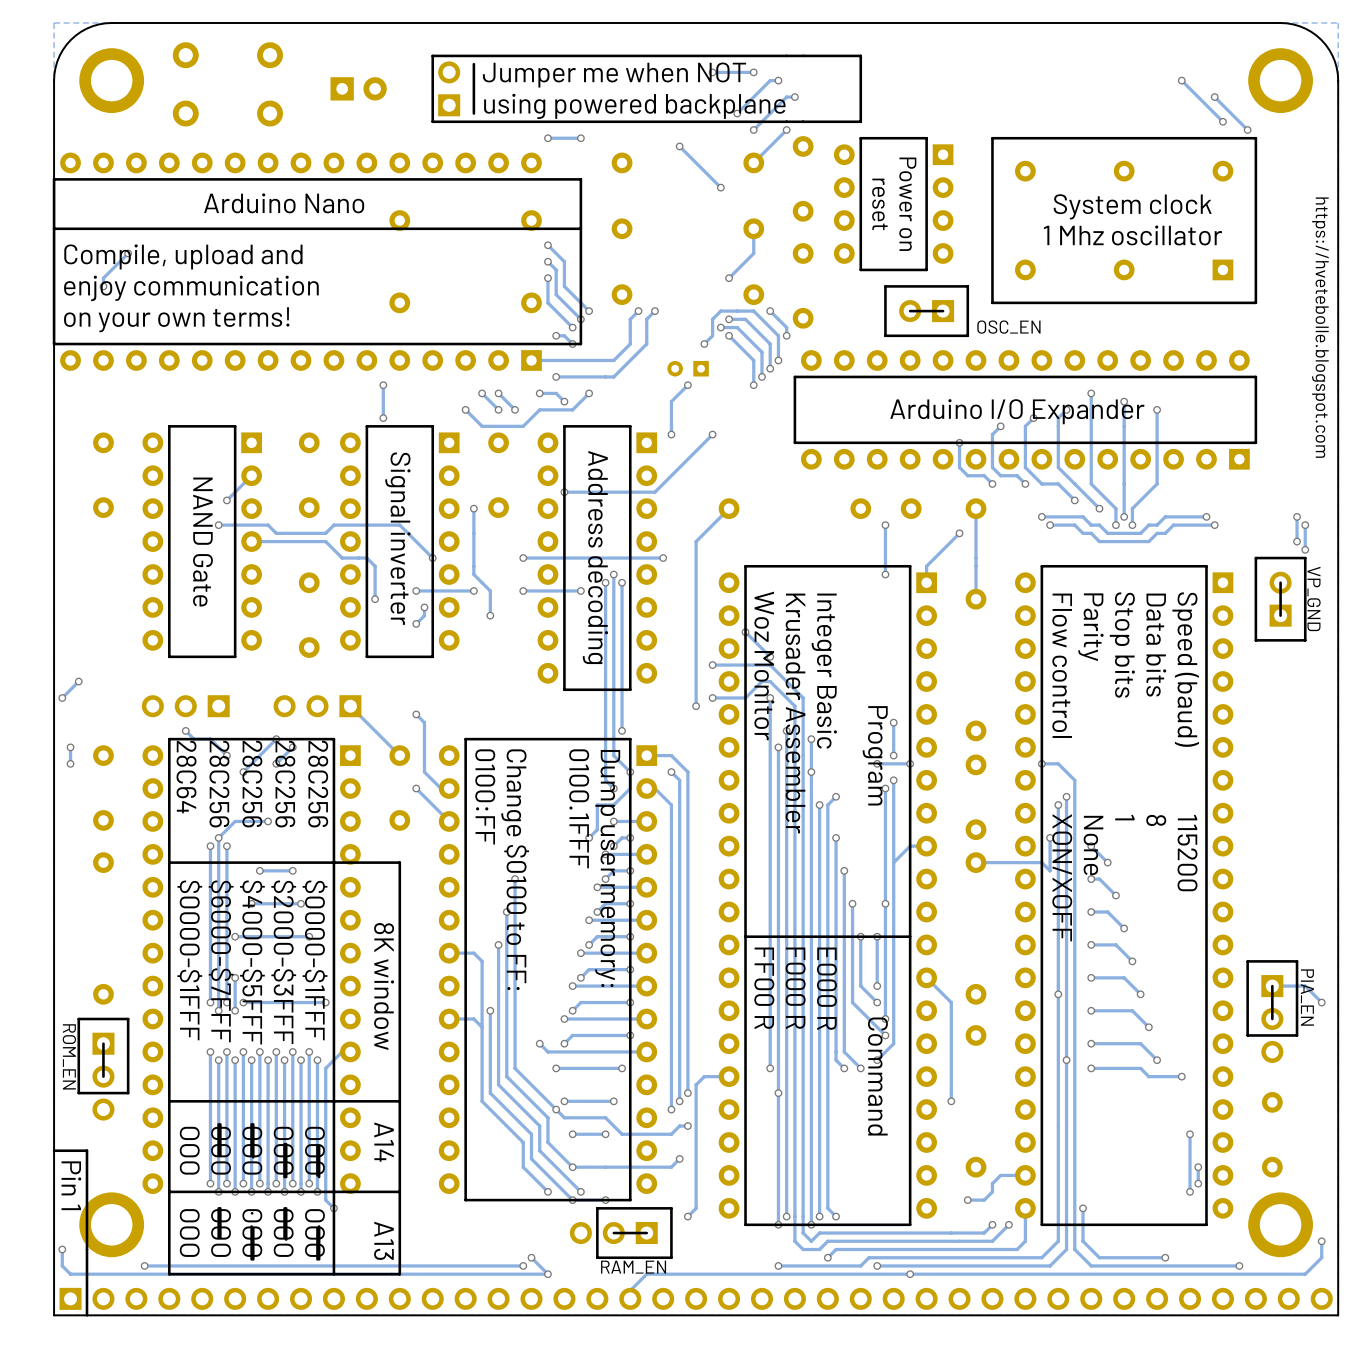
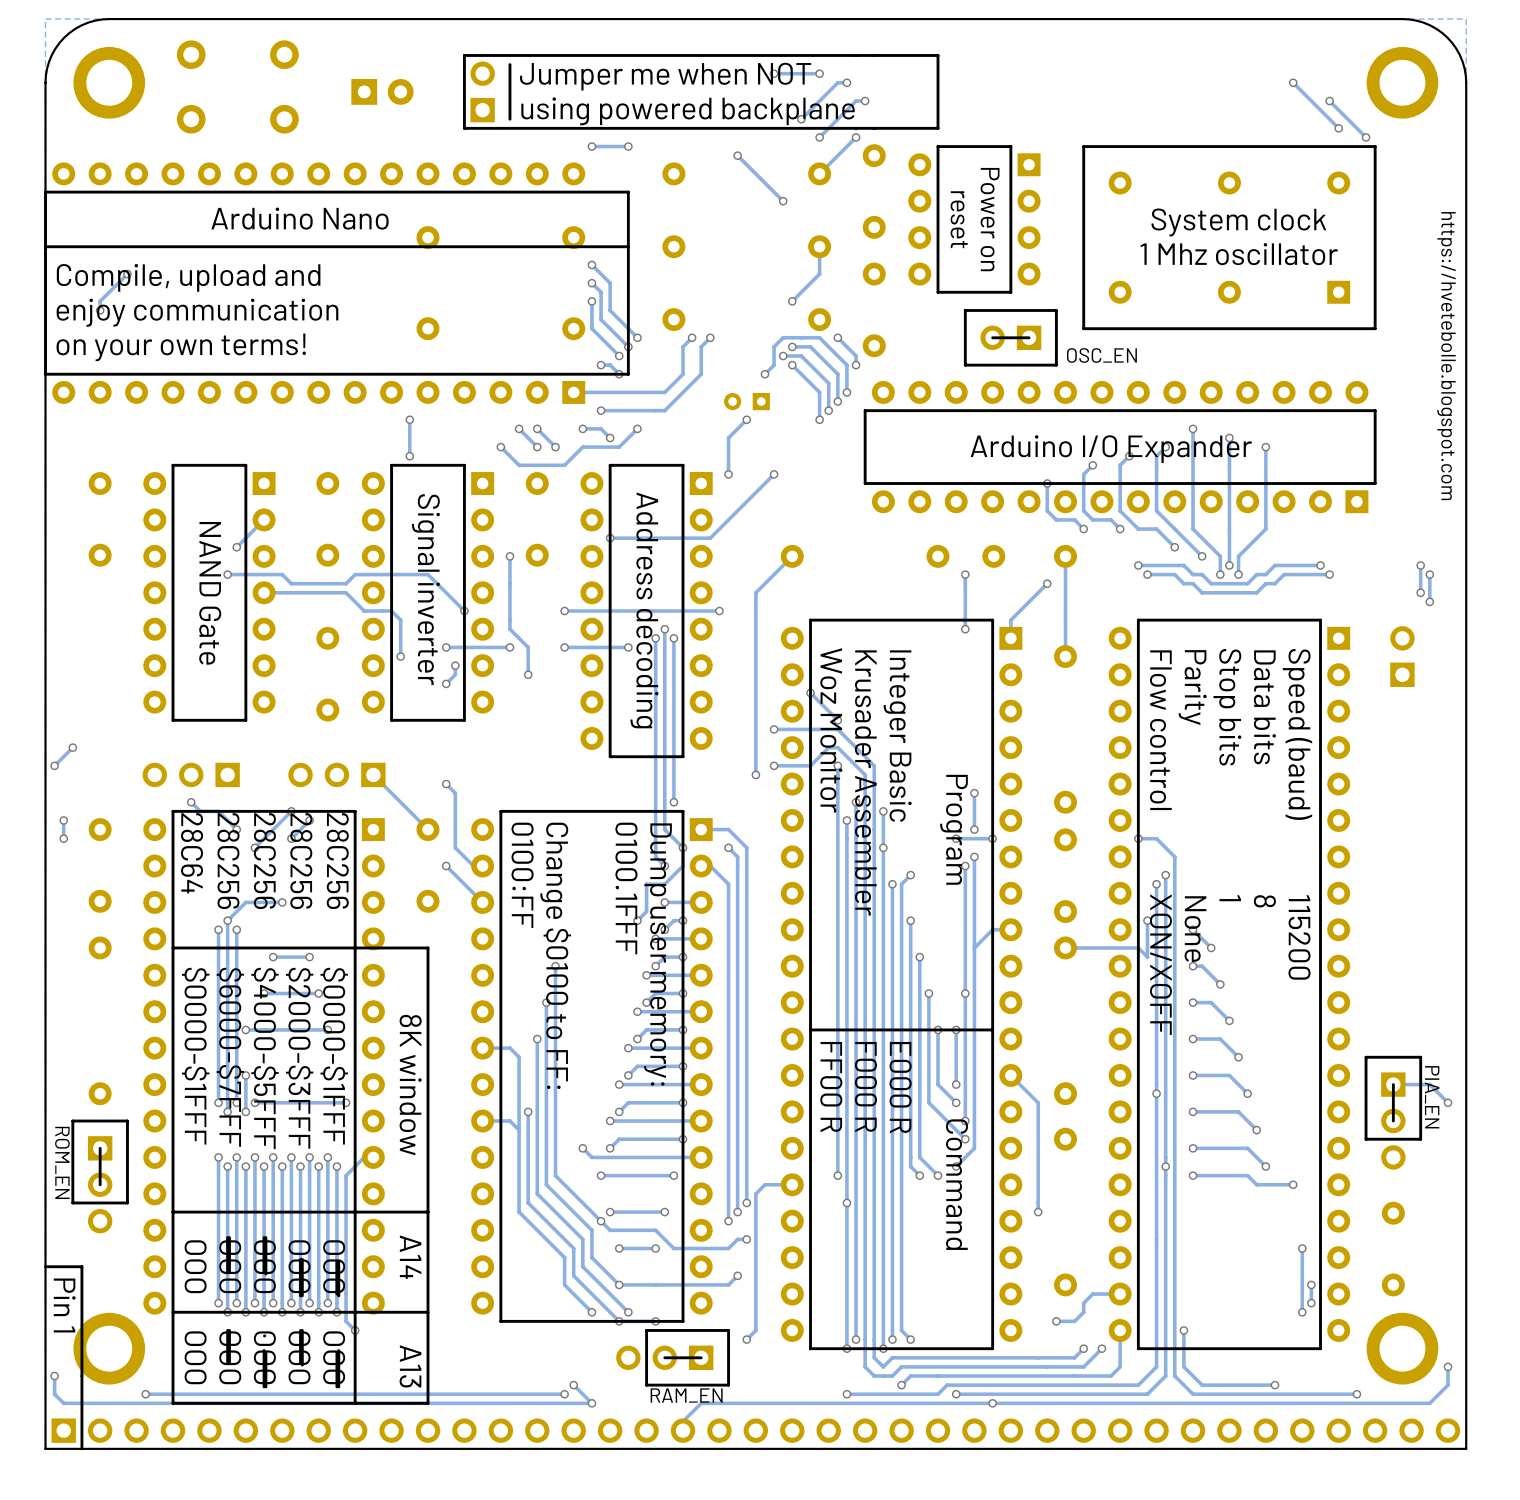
line: (1305, 558) (1305, 640) (1255, 640) (1255, 558) (1305, 558) -> none
line: (1280, 582) (1280, 615) -> none
text: VP_GND (1313, 598) -> none

